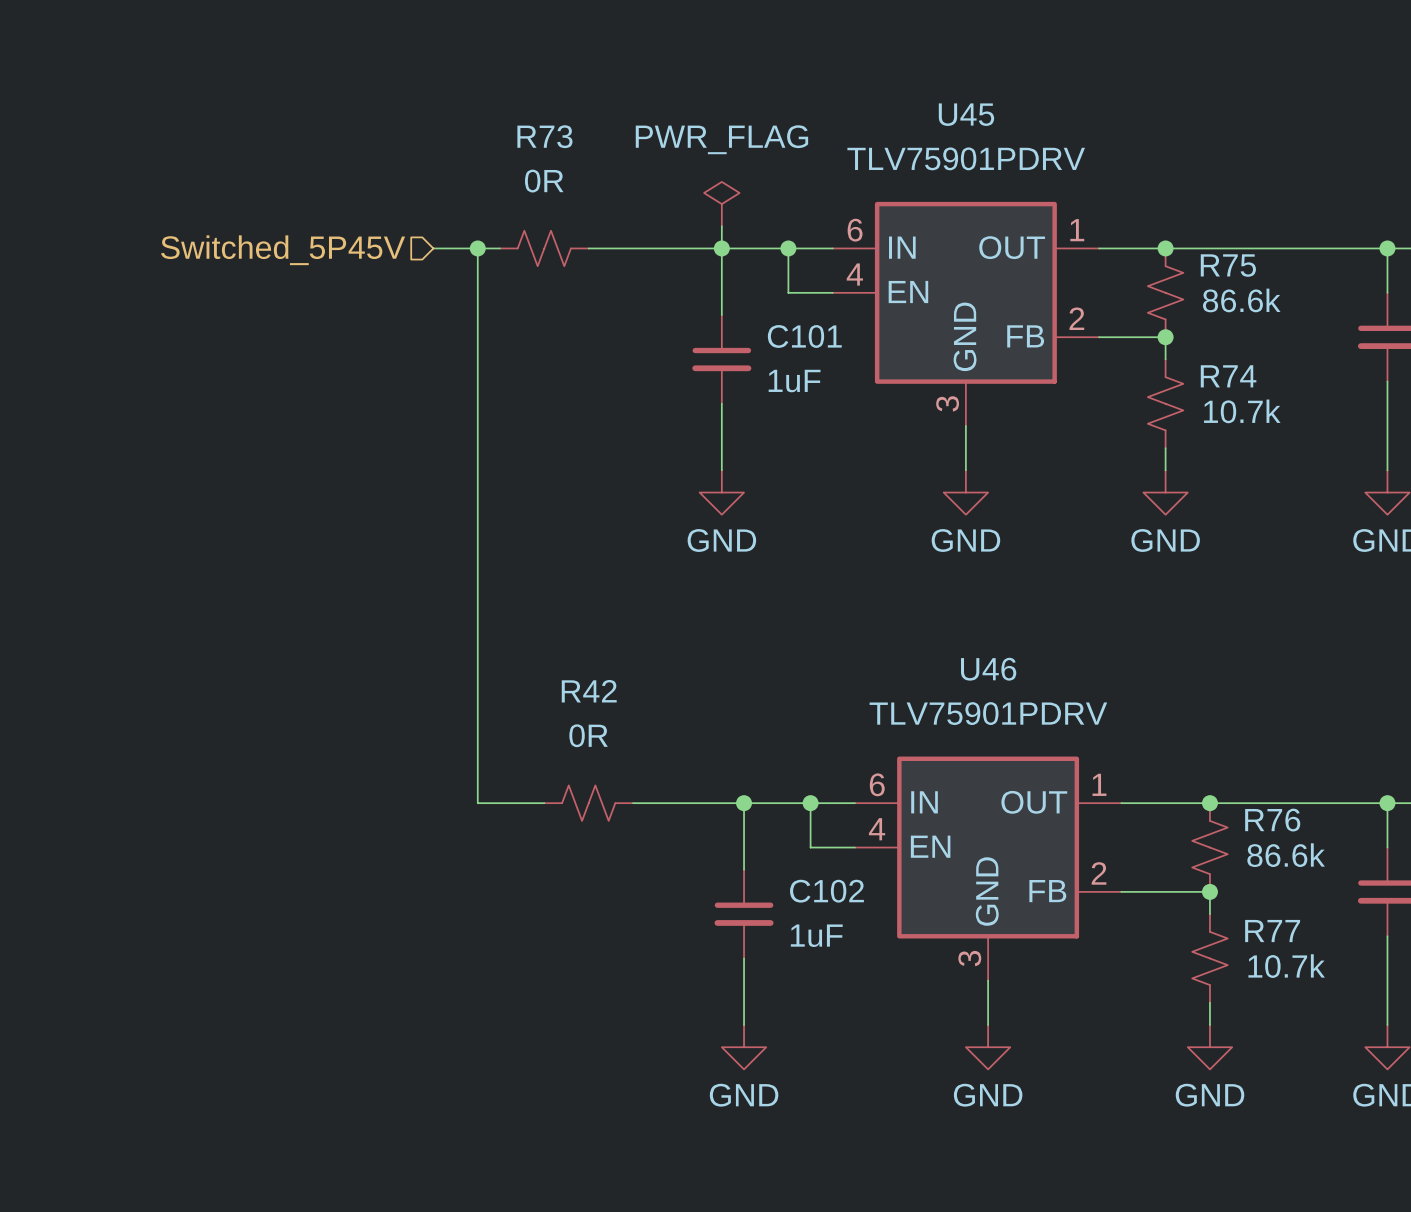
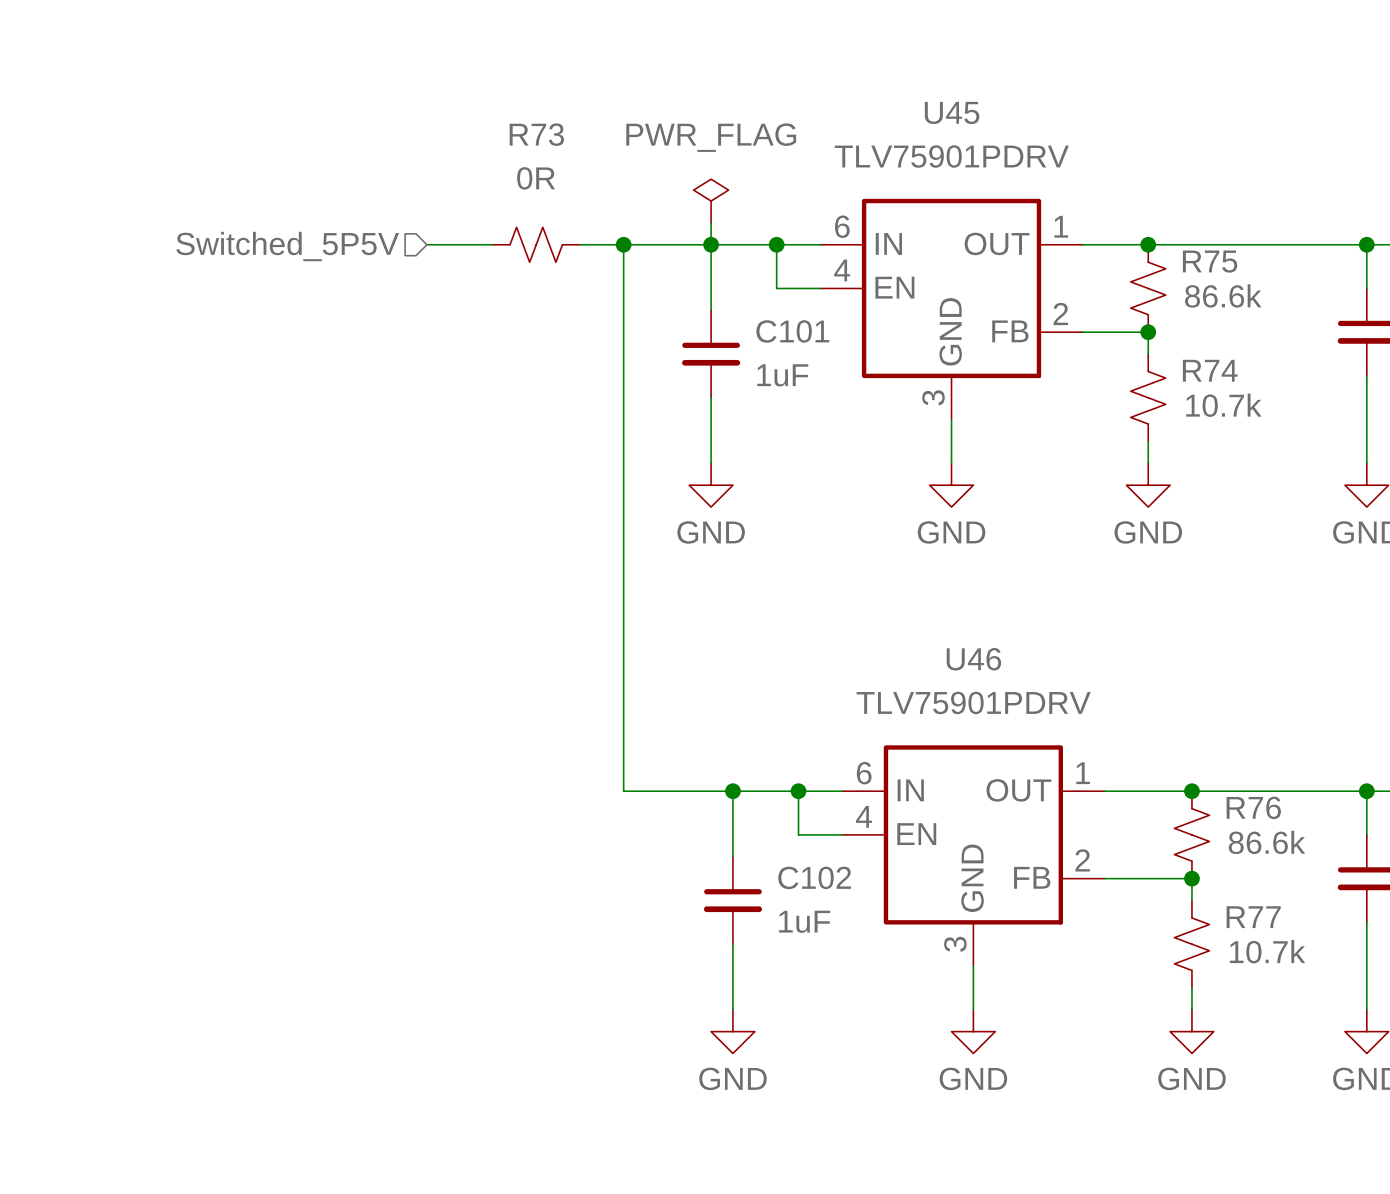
wire: (477, 248) (477, 803) (544, 803) -> none
junction: (477, 248) -> none
wire: none -> (623, 244) (623, 791)
junction: none -> (623, 244)
hierarchical label: Switched_5P45V (283, 250) -> Switched_5P5V (287, 246)
R42: 0R (588, 803) -> none

